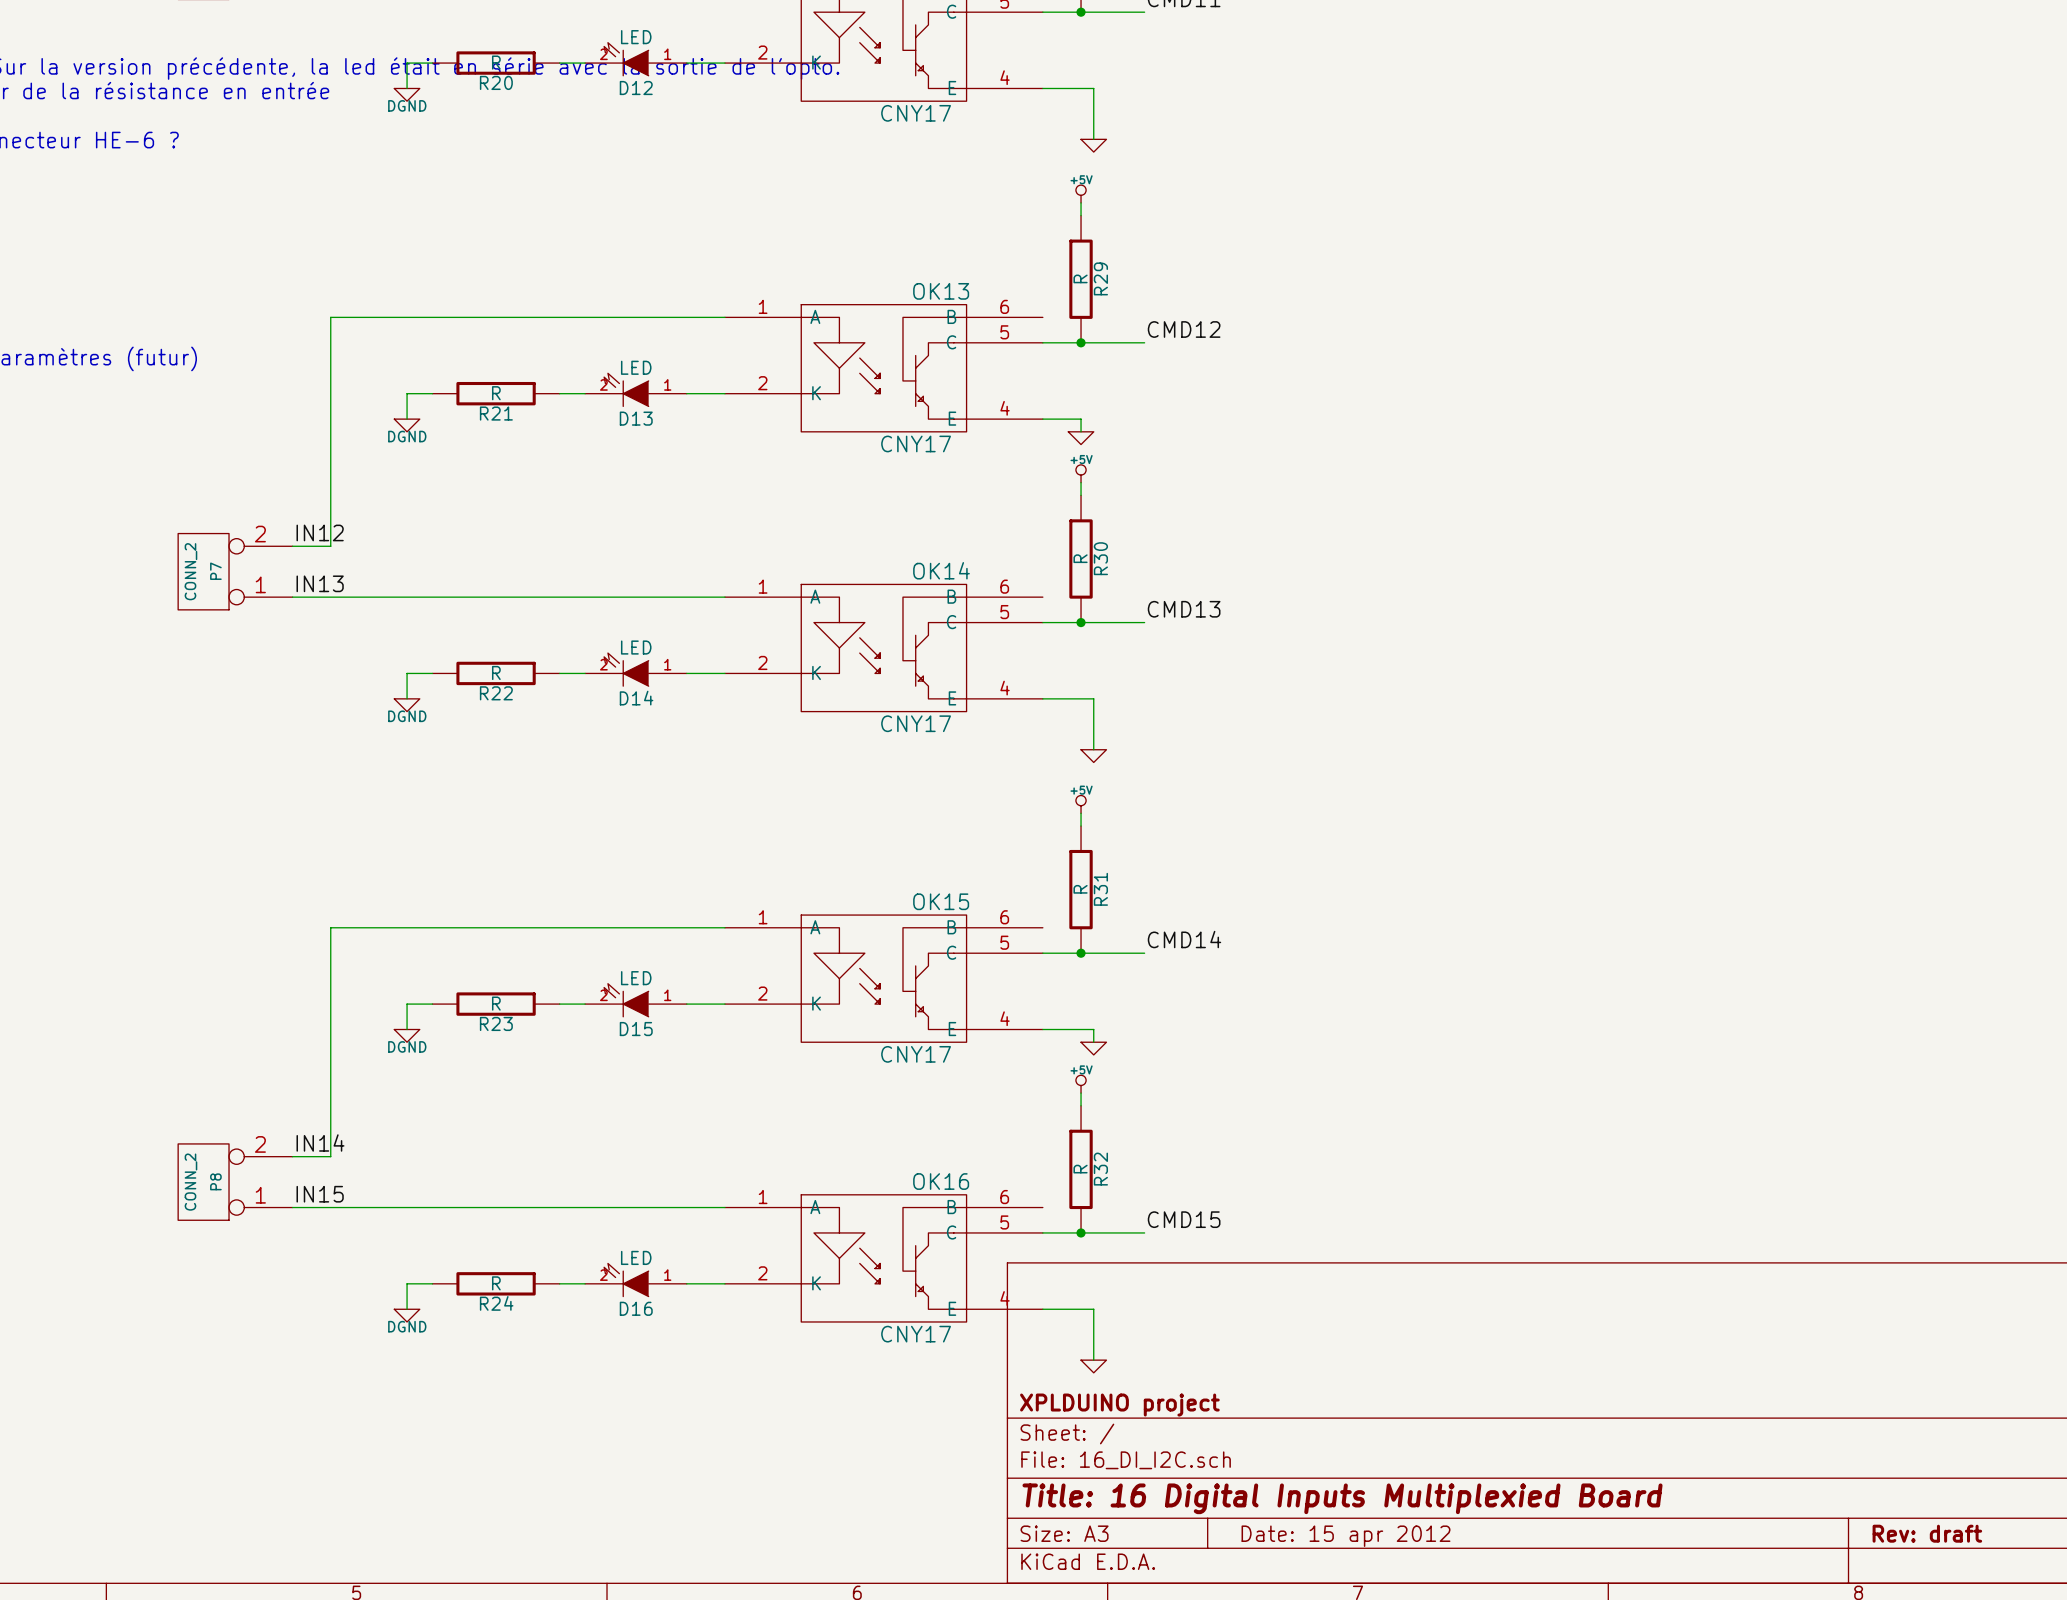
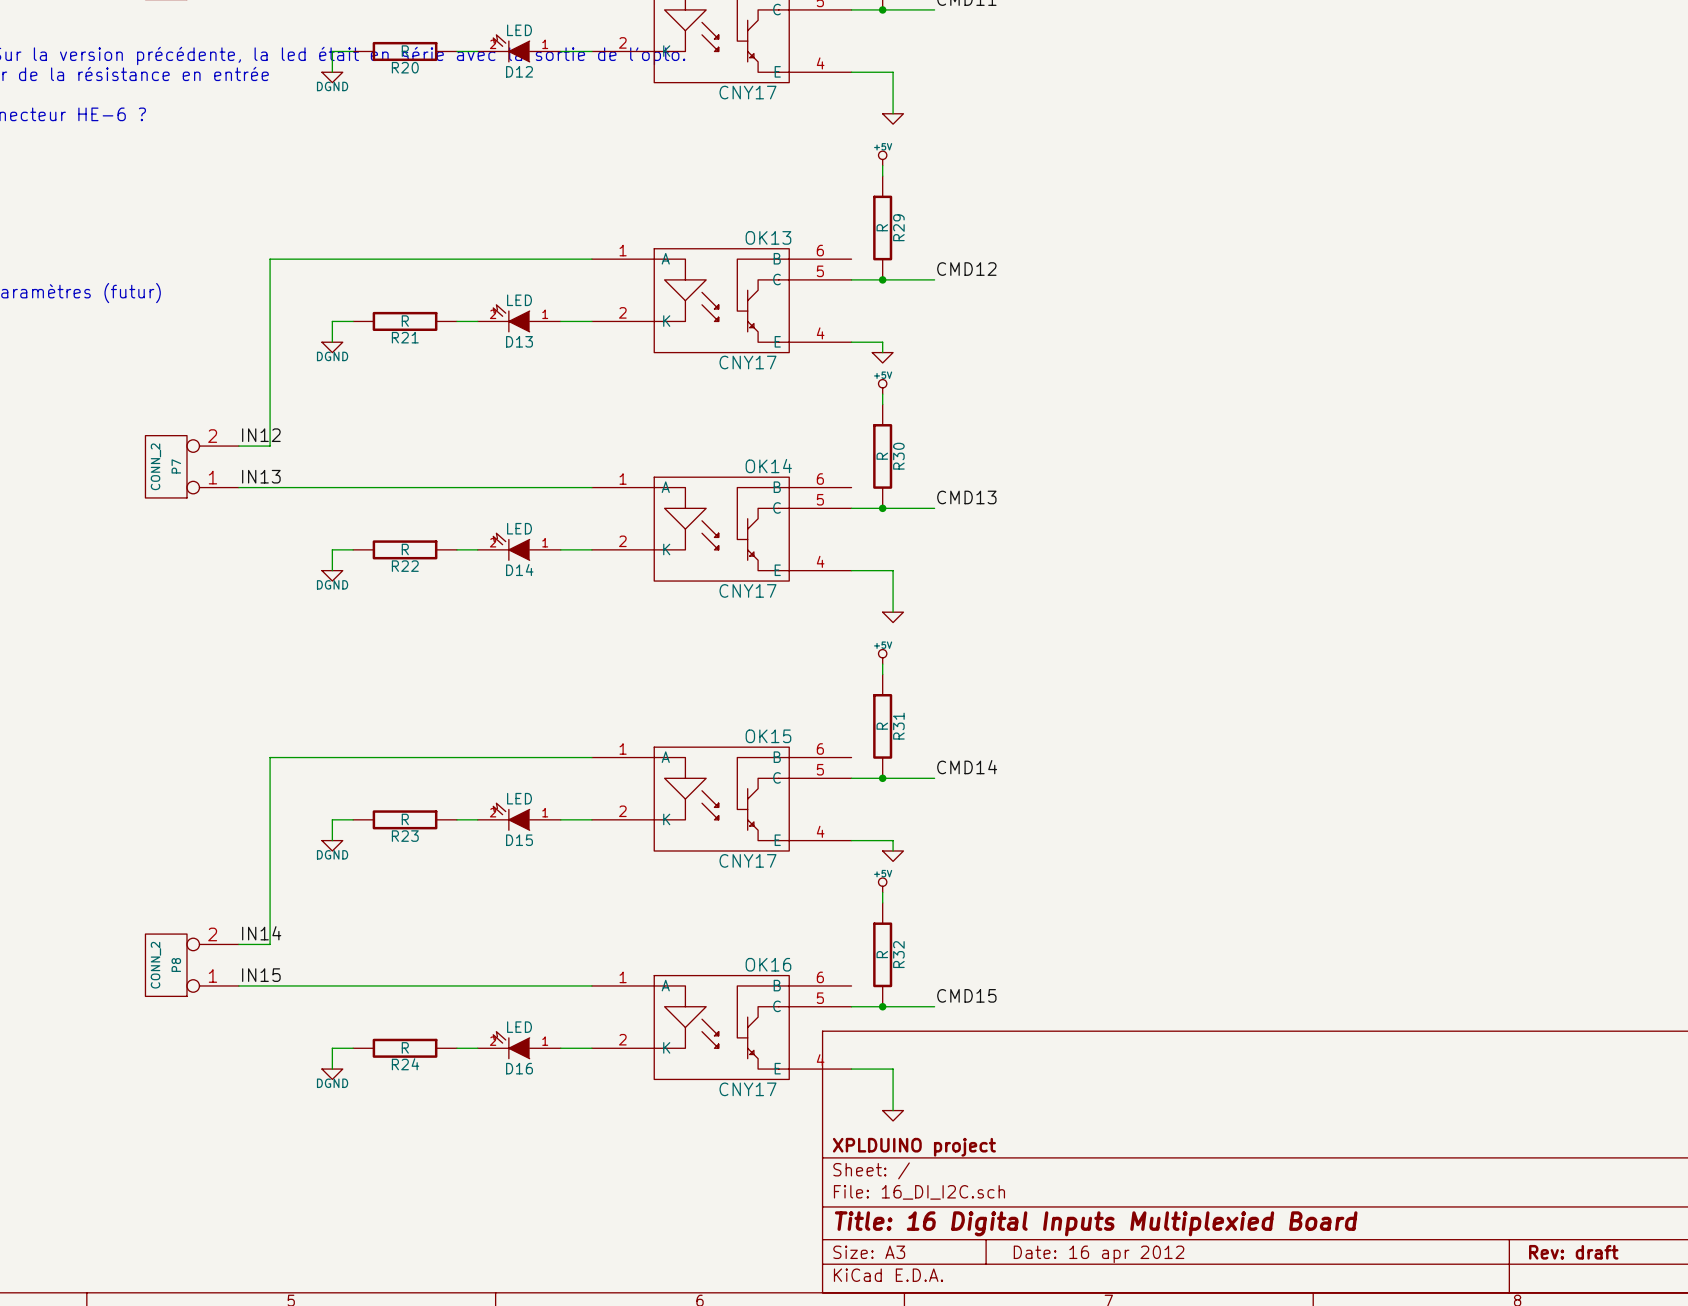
title block: Date: 15 apr 2012 (1346, 1536) -> Date: 16 apr 2012 (1099, 1254)

